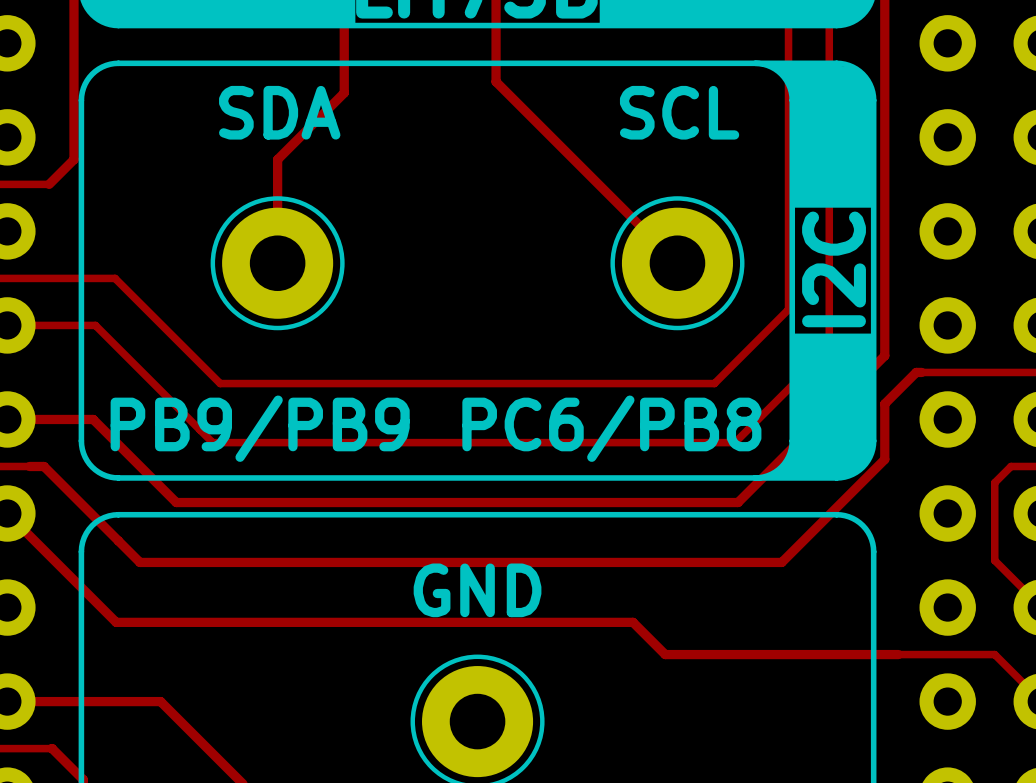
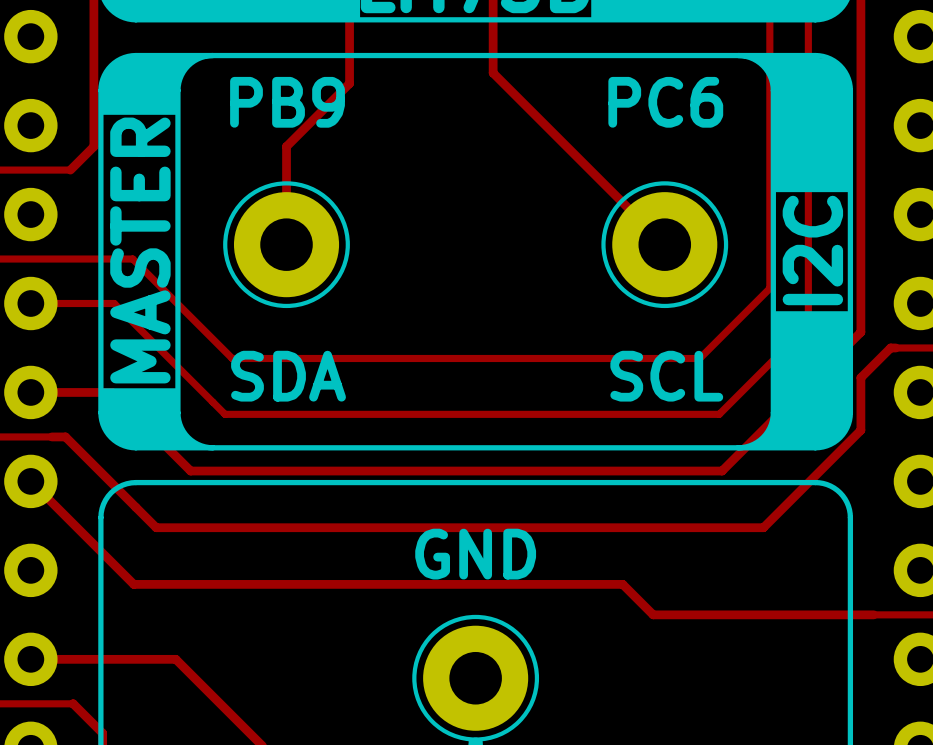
drawing: none -> [100, 55, 199, 115]
line: none -> (212, 55) (201, 57) (188, 65) (179, 78) (177, 90) (178, 416) (183, 431) (191, 440) (201, 445) (212, 447)
text: SDA (279, 112) -> PB9 (287, 102)
text: SCL (679, 112) -> PC6 (665, 102)
text: none -> MASTER (140, 250)
text: none -> SCL (666, 376)
drawing: none -> [100, 388, 206, 448]
text: PB9/PB9 (260, 428) -> SDA (288, 376)
text: PC6/PB8 (611, 428) -> none

